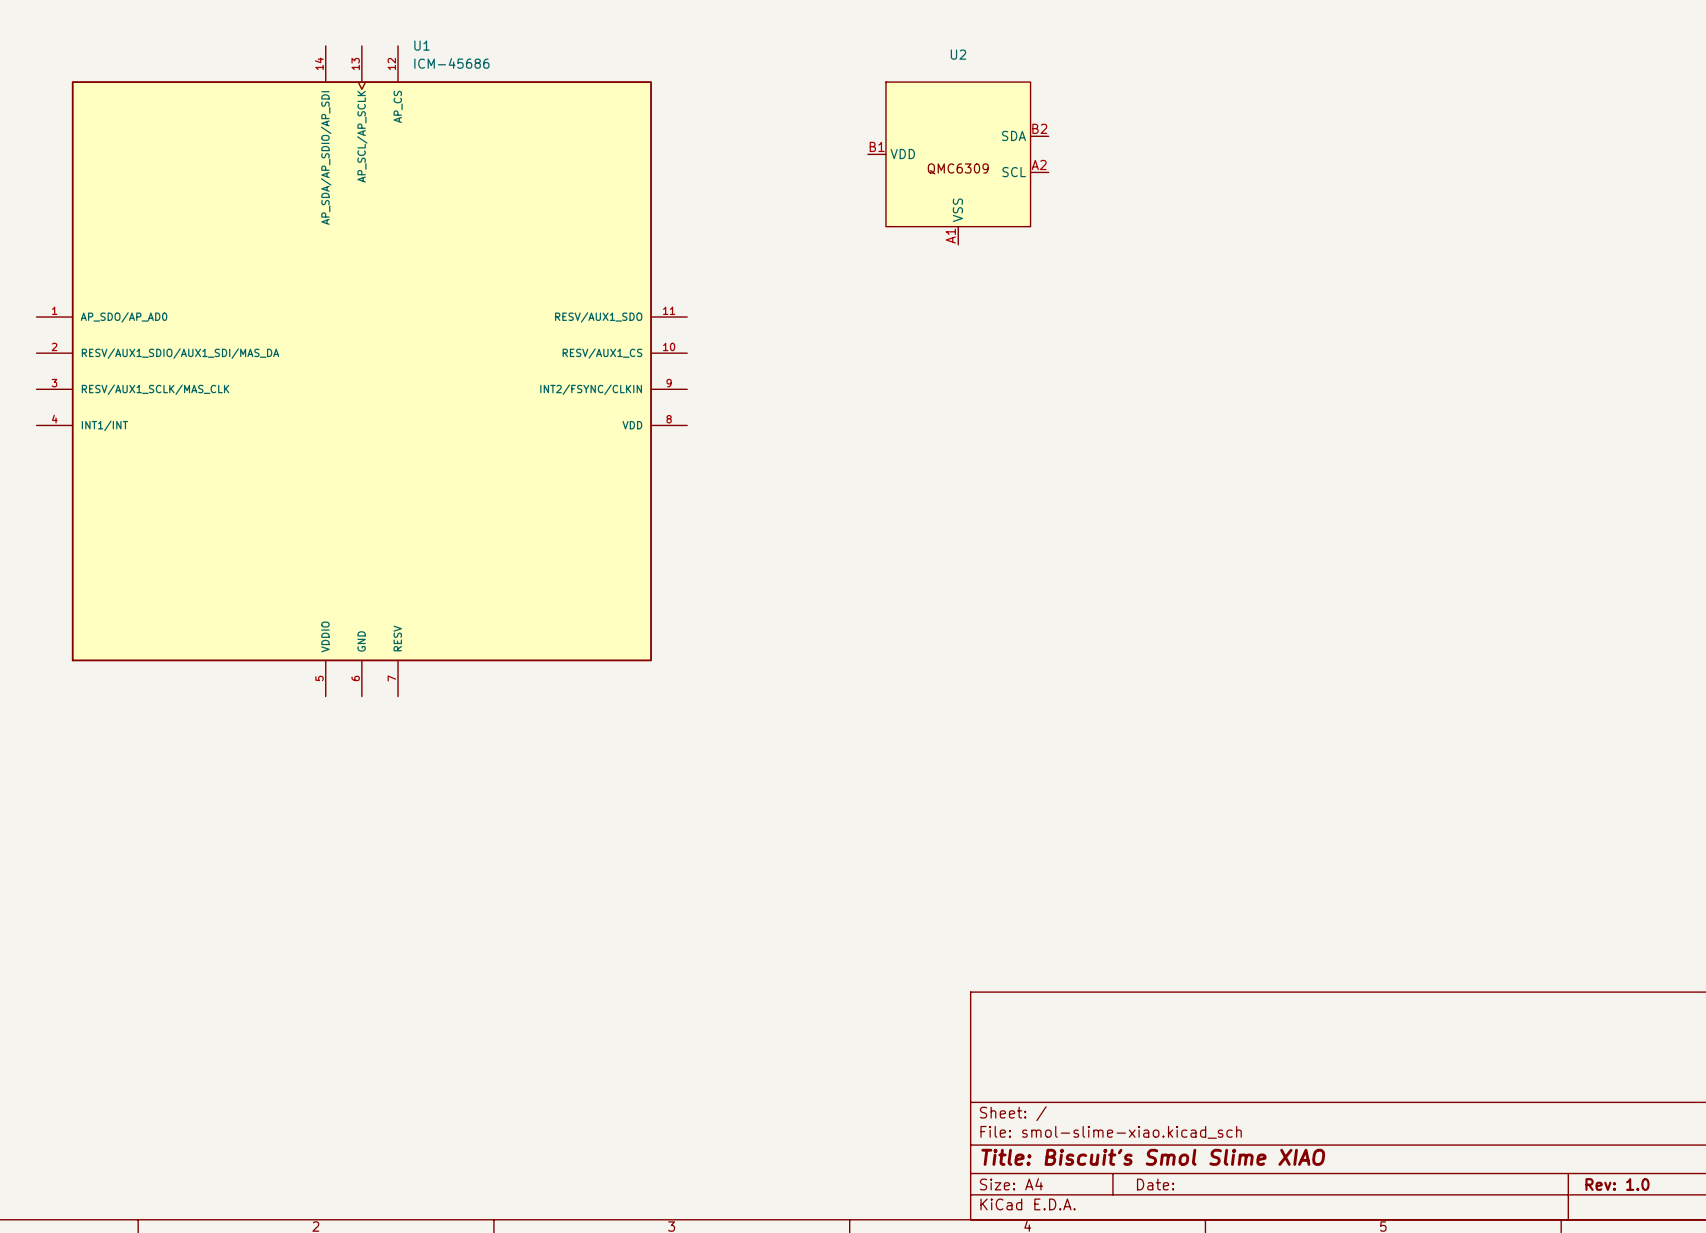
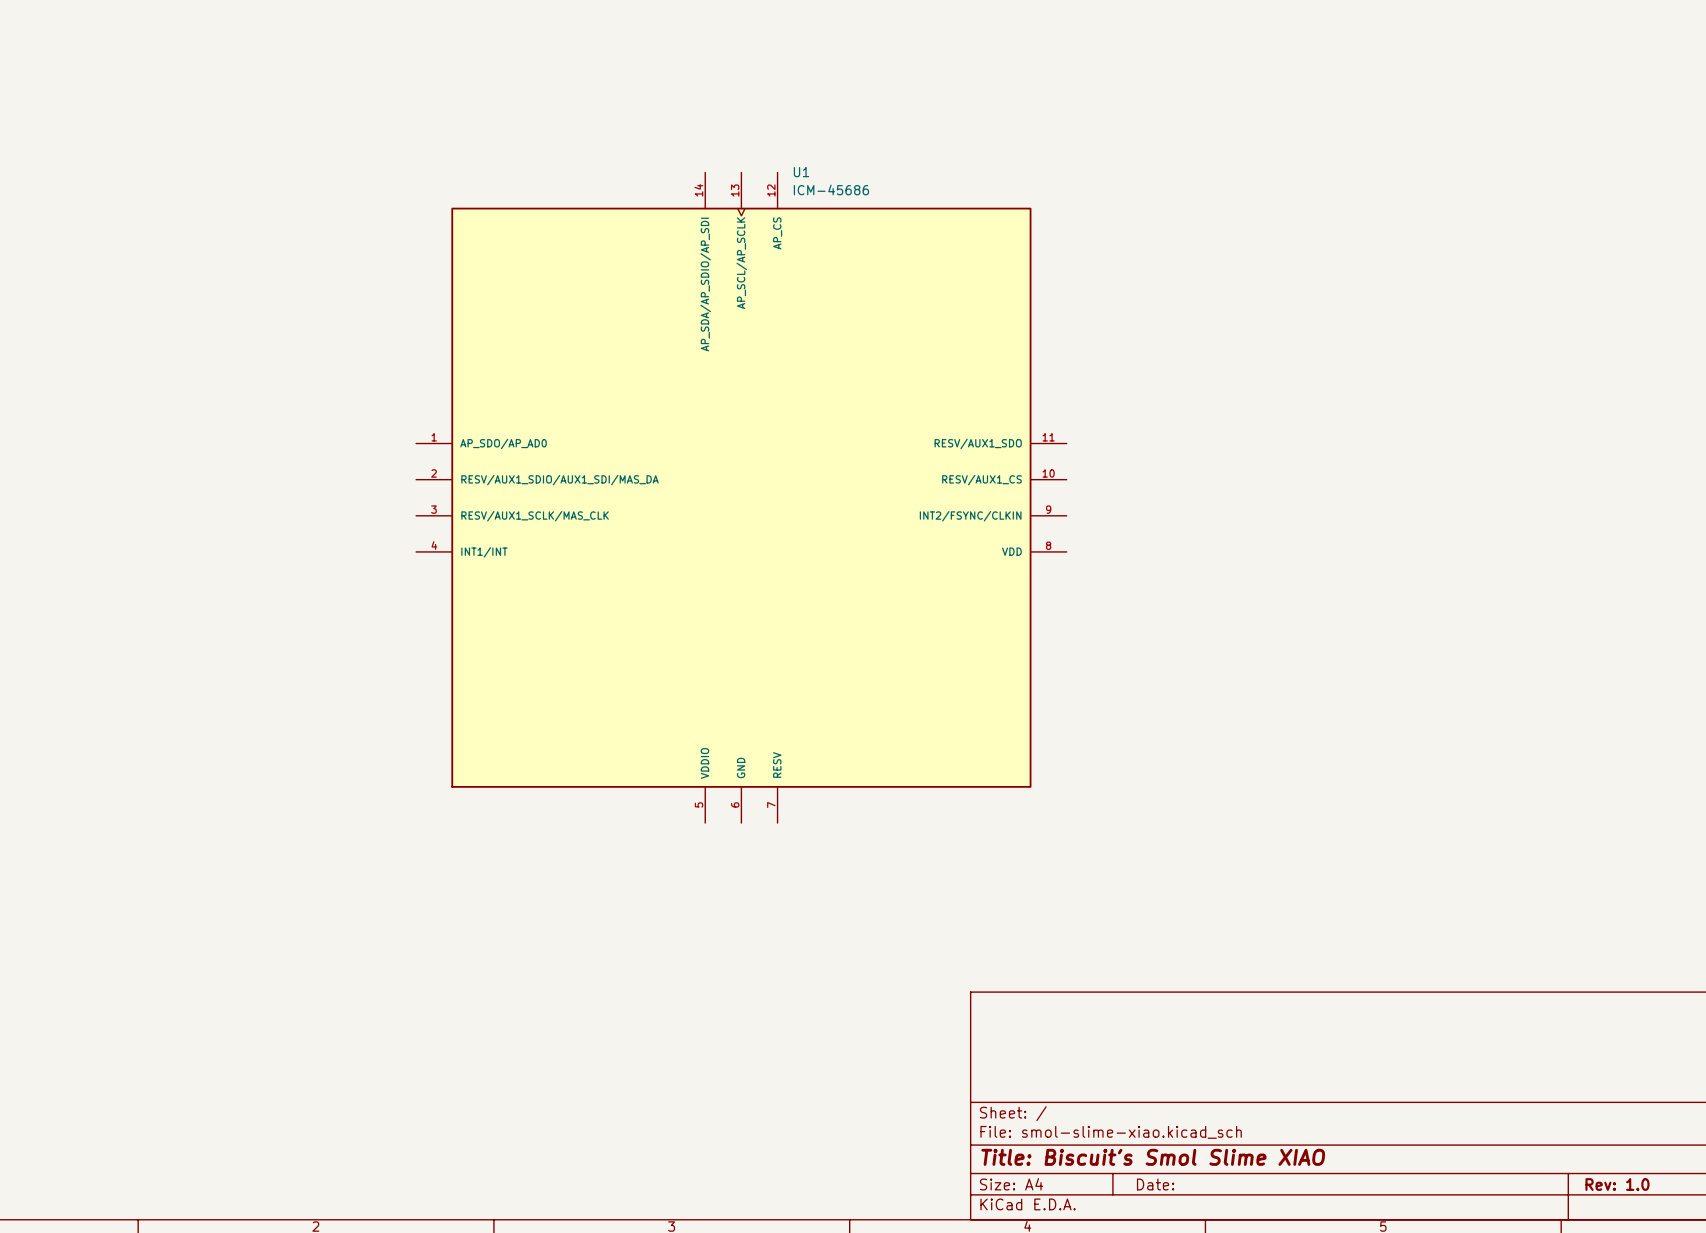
U2: (958, 163) -> none
U1 position: (361, 371) -> (741, 497)

